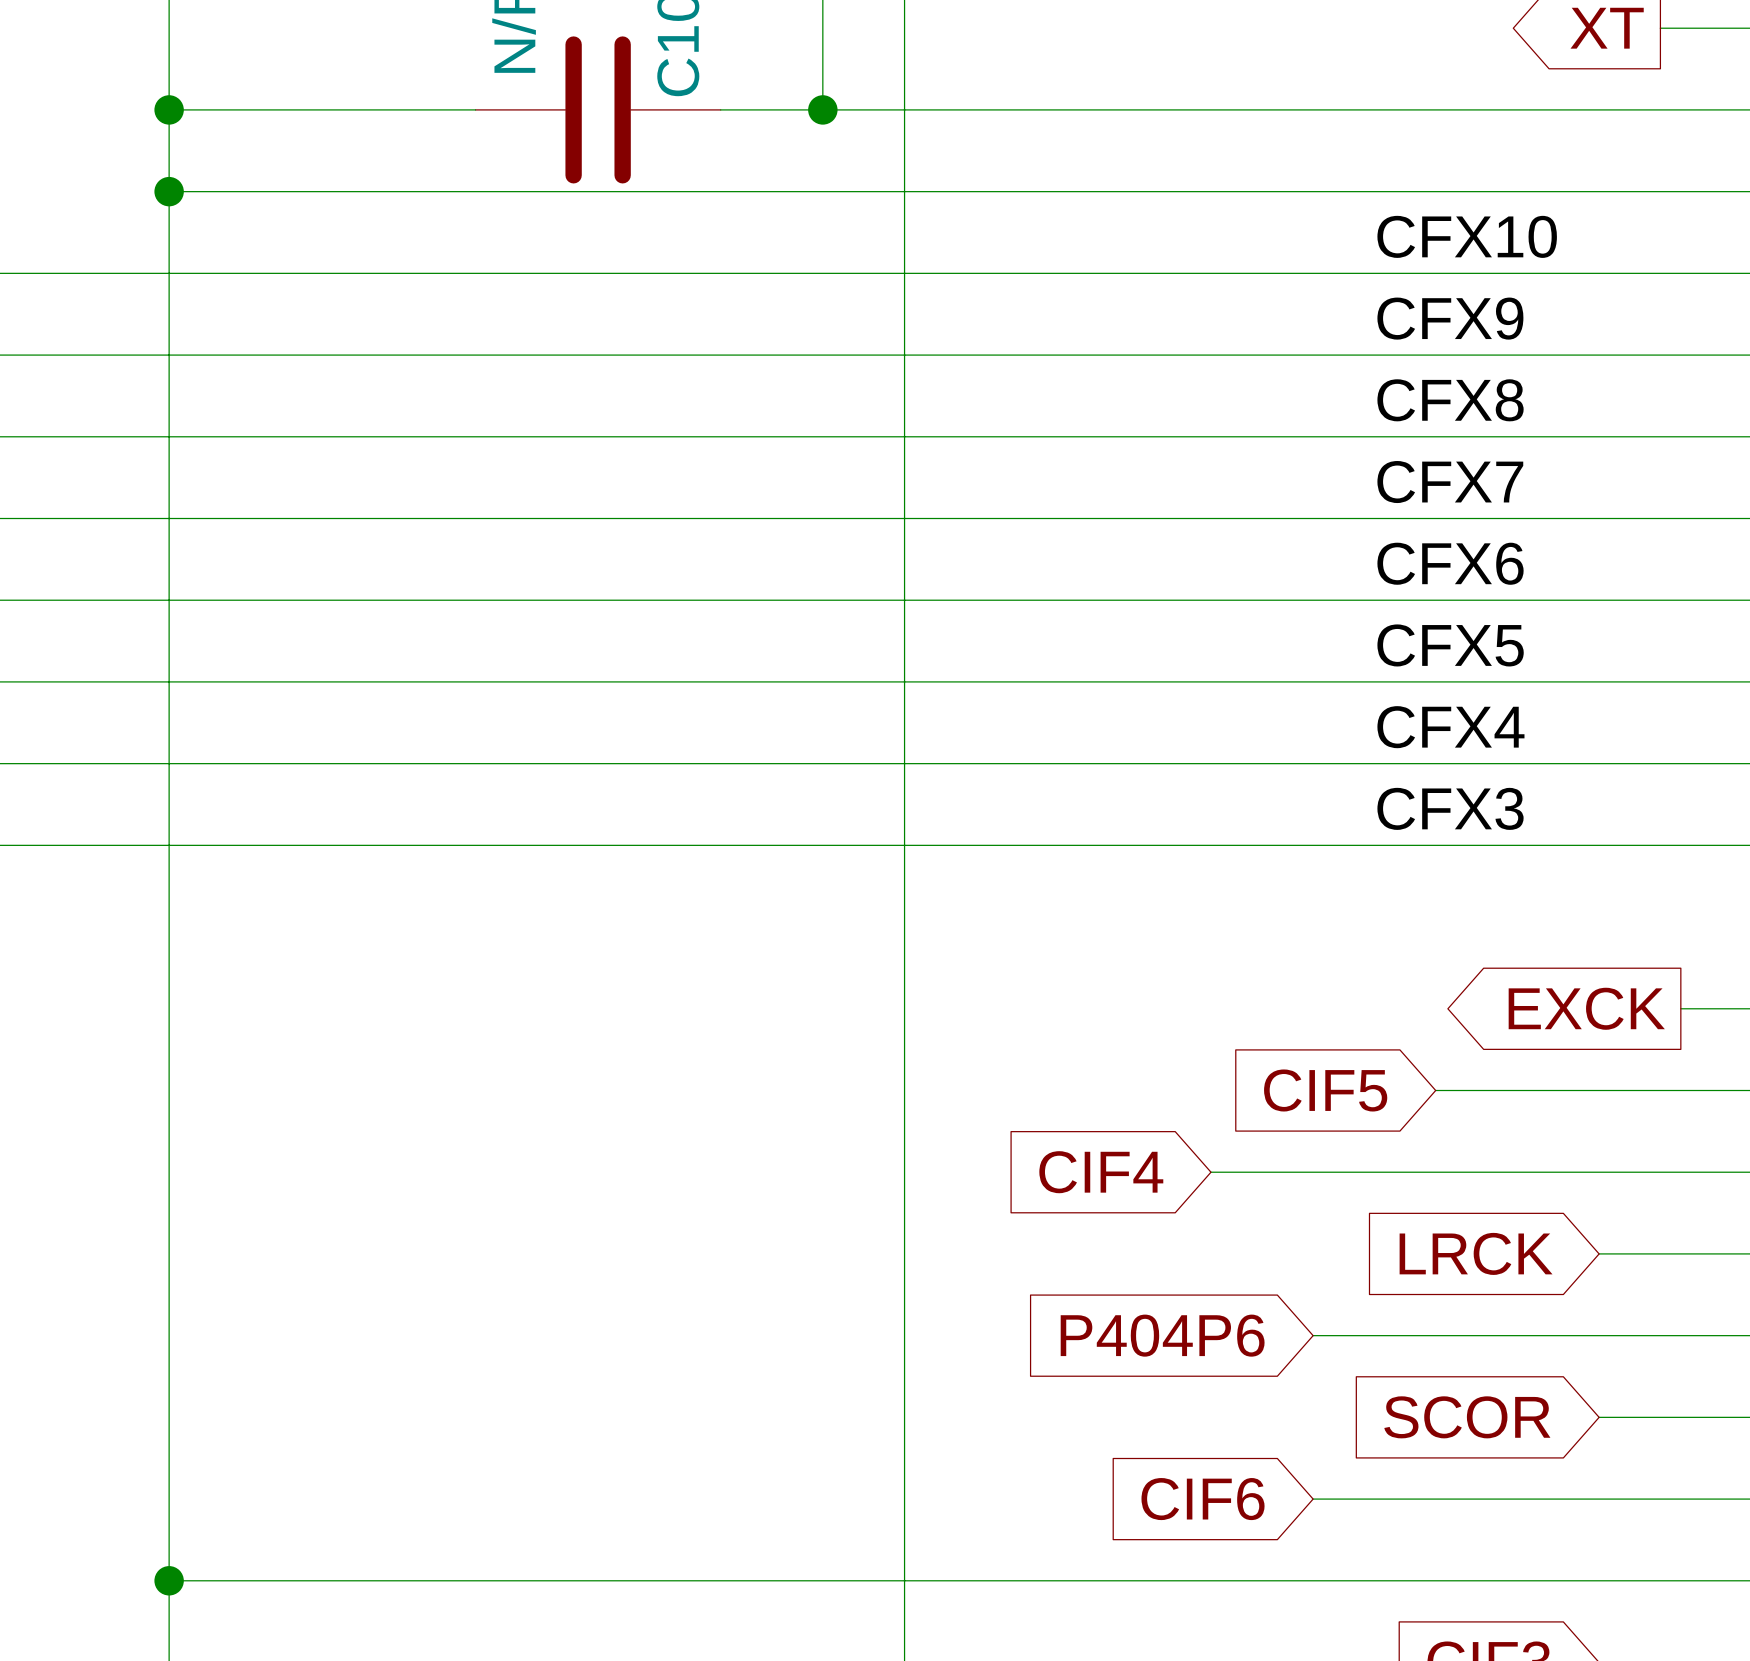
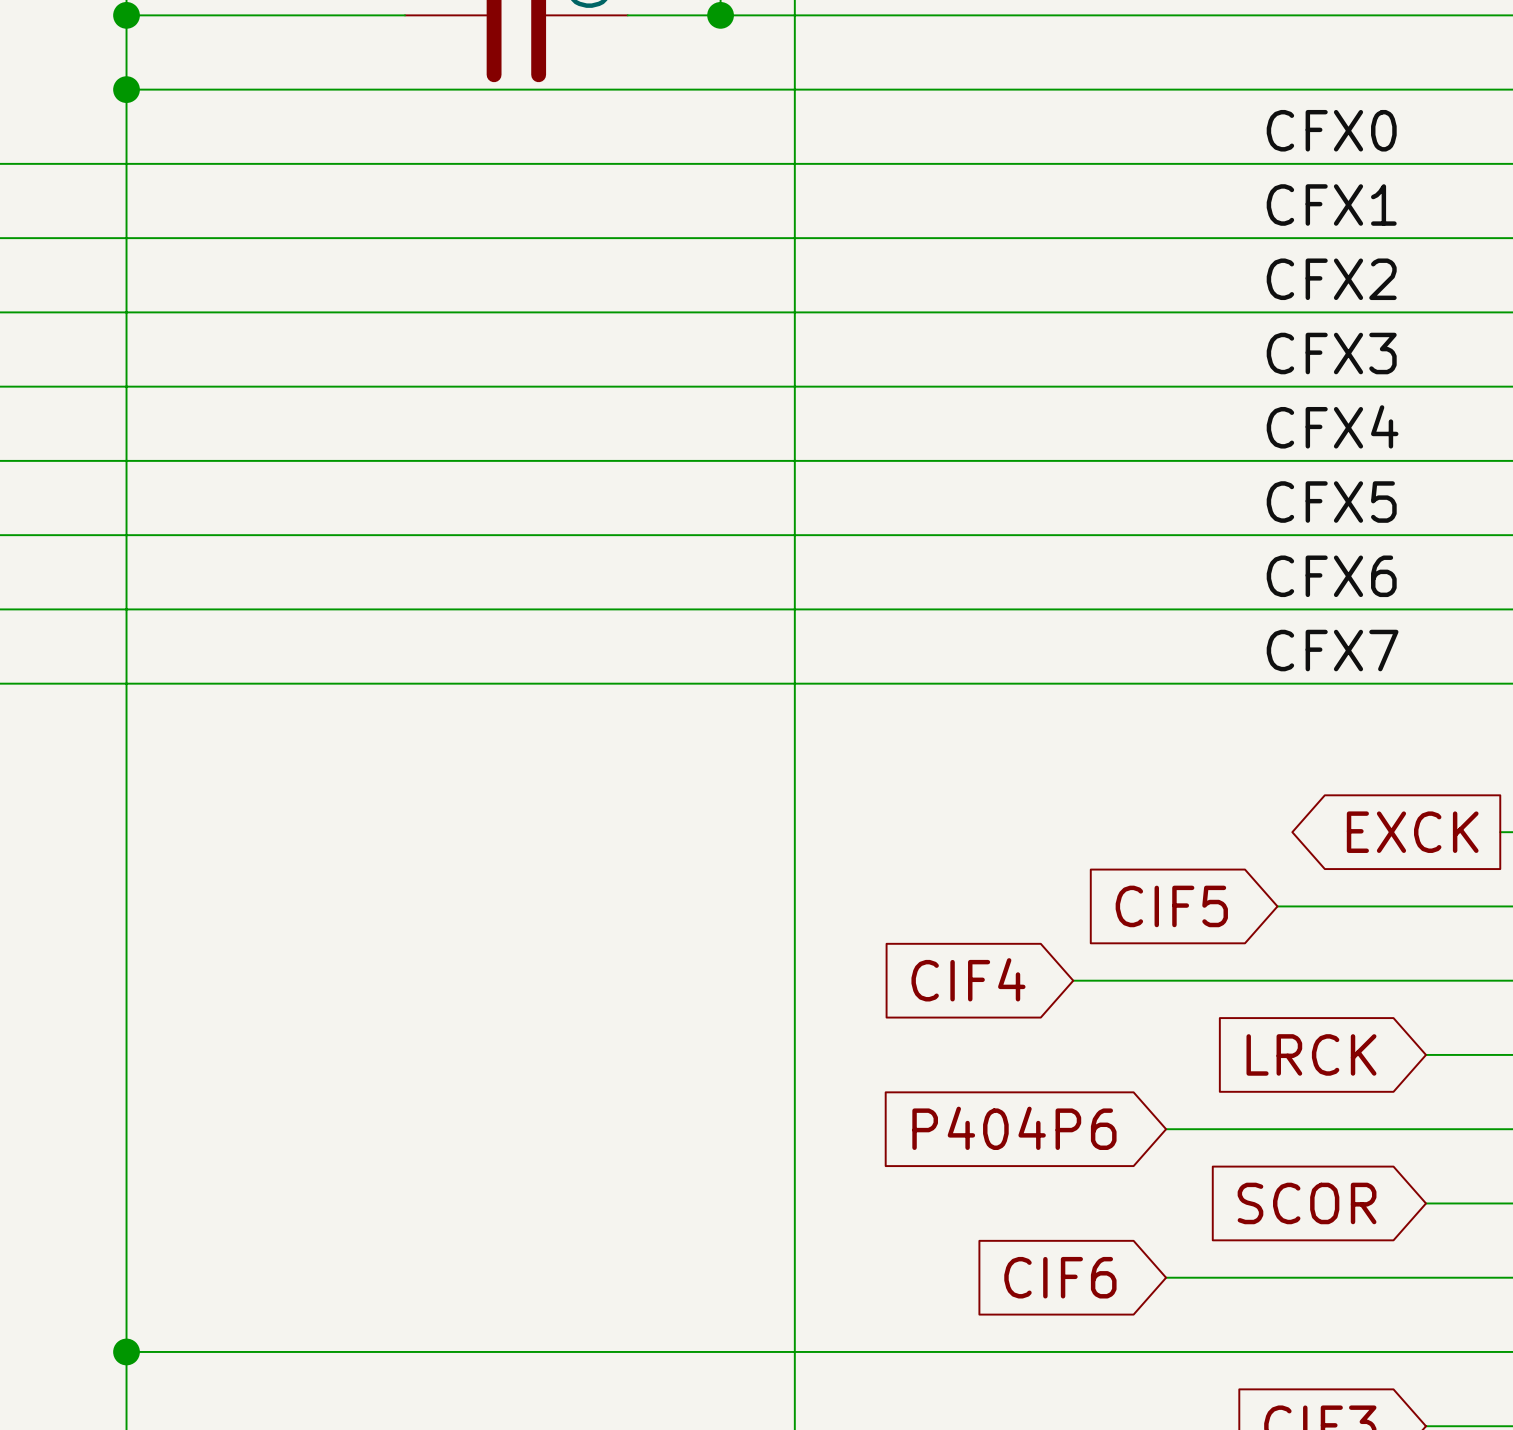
label: CFX10 (1467, 236) -> CFX0 (1331, 130)
label: CFX9 (1450, 318) -> CFX1 (1331, 205)
label: CFX8 (1450, 400) -> CFX2 (1331, 279)
label position: CFX7 (1450, 482) -> CFX7 (1332, 650)
label position: CFX6 (1450, 563) -> CFX6 (1331, 576)
label position: CFX5 (1450, 645) -> CFX5 (1331, 502)
label position: CFX4 (1450, 727) -> CFX4 (1332, 426)
label position: CFX3 (1450, 808) -> CFX3 (1331, 353)

